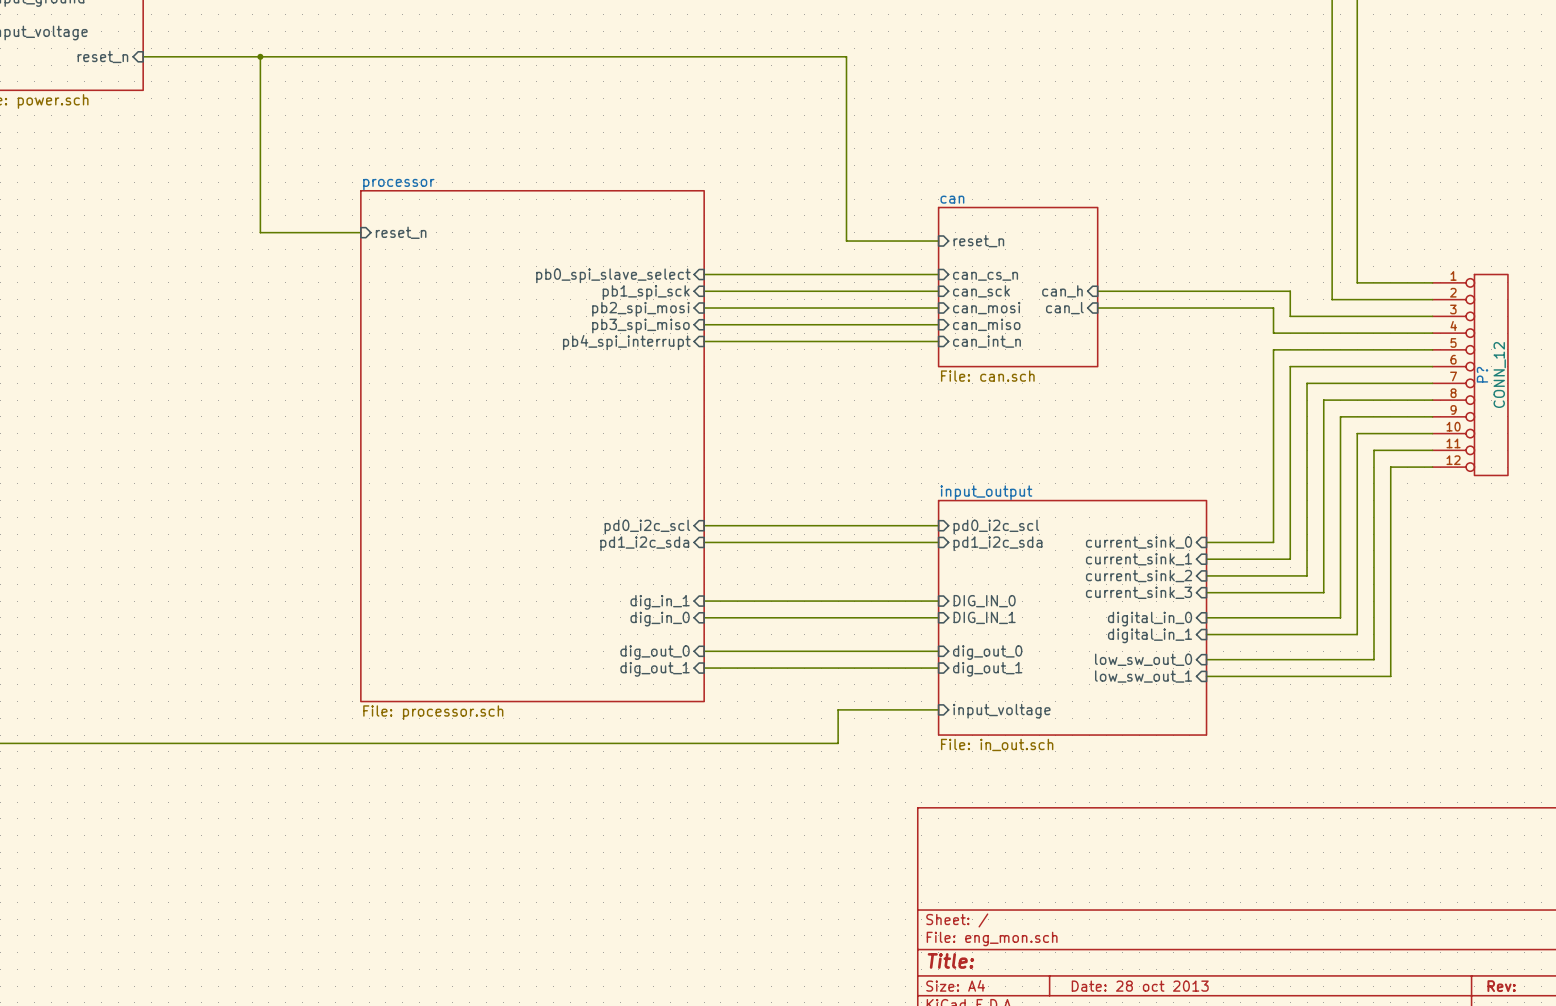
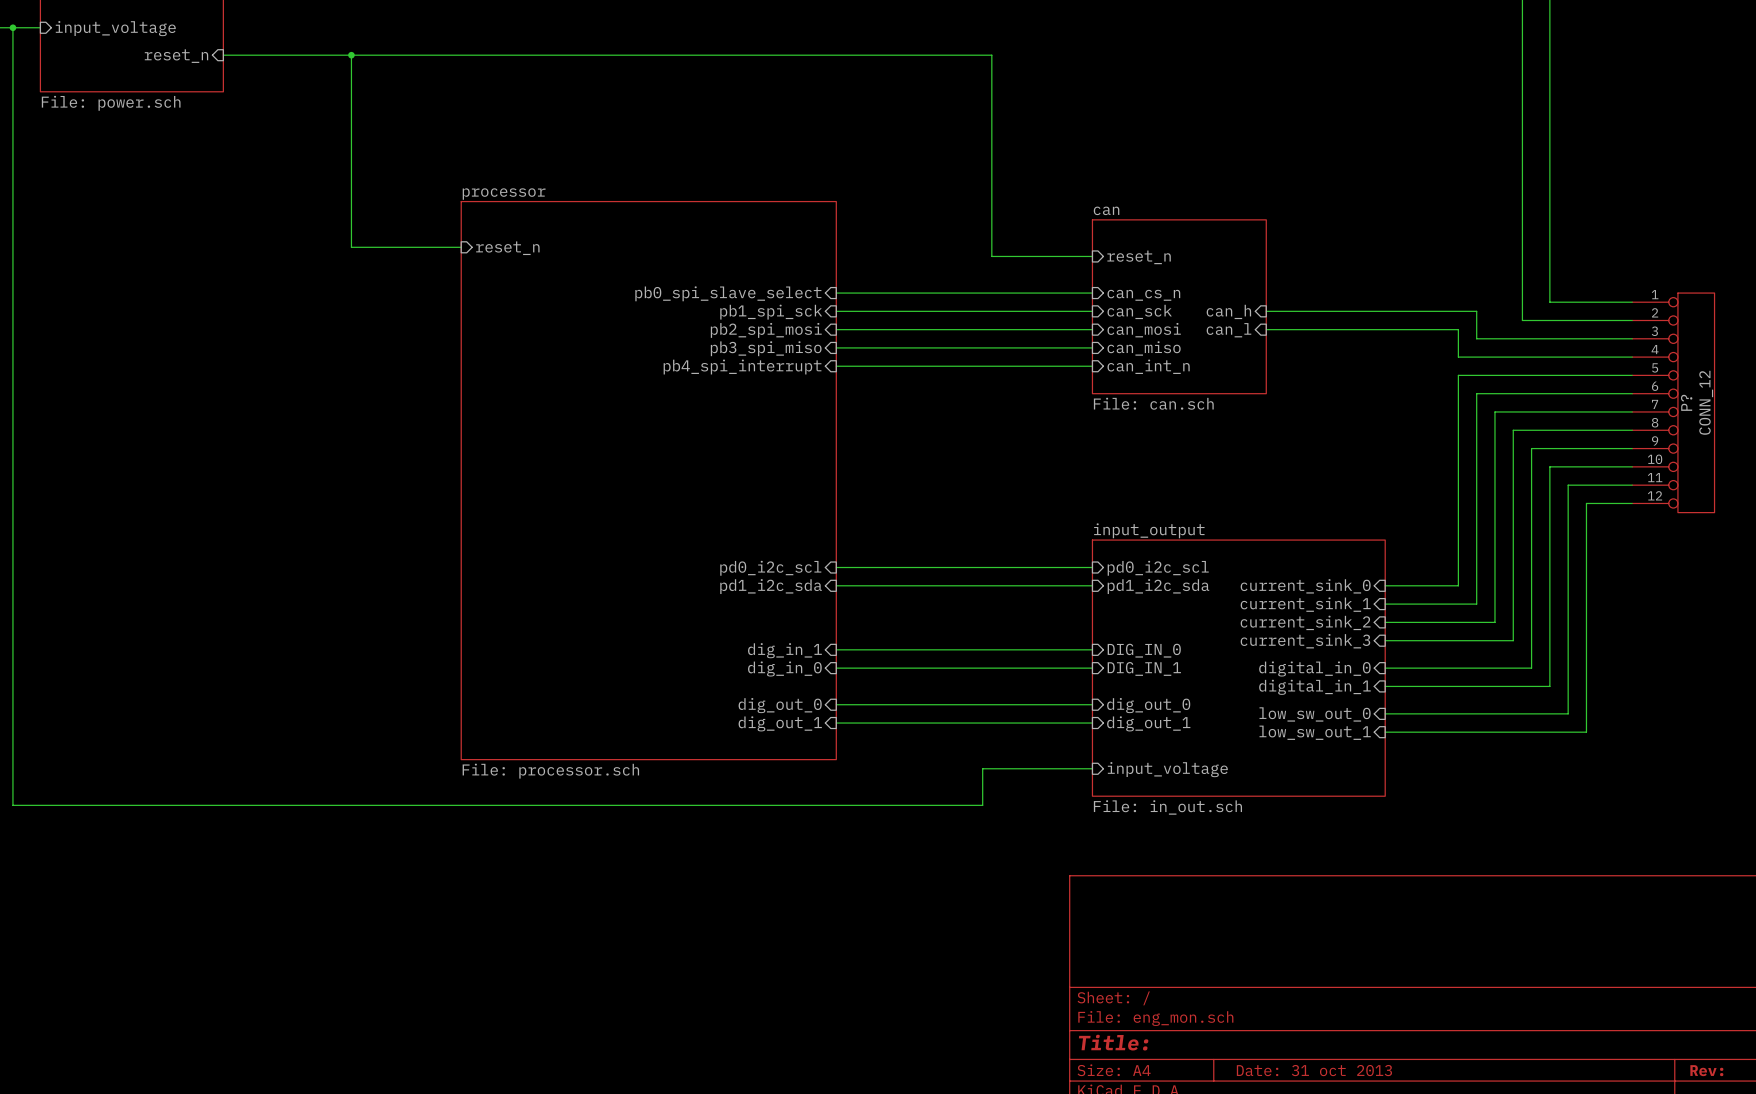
title block: Date: 28 oct 2013 (1140, 986) -> Date: 31 oct 2013 (1314, 1070)

